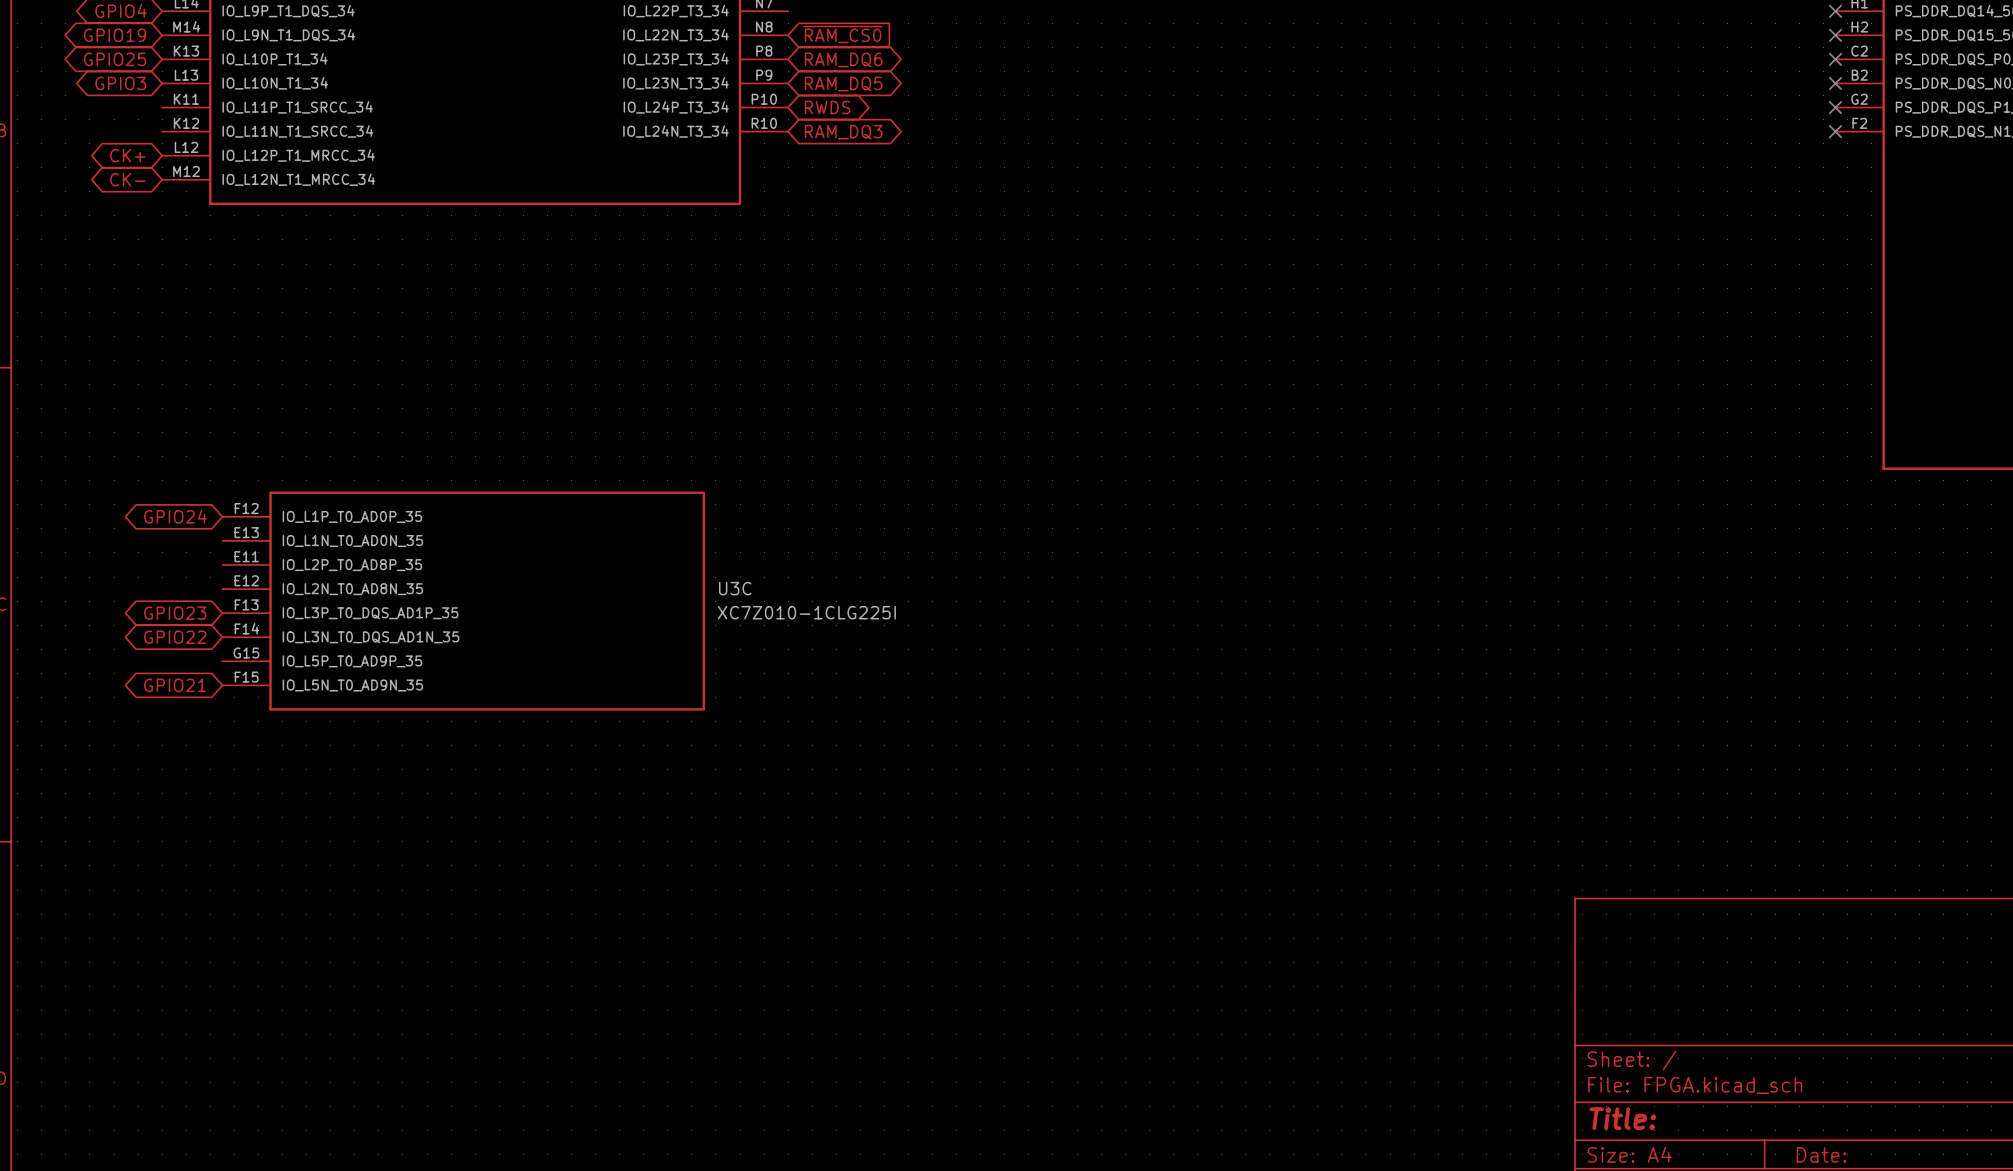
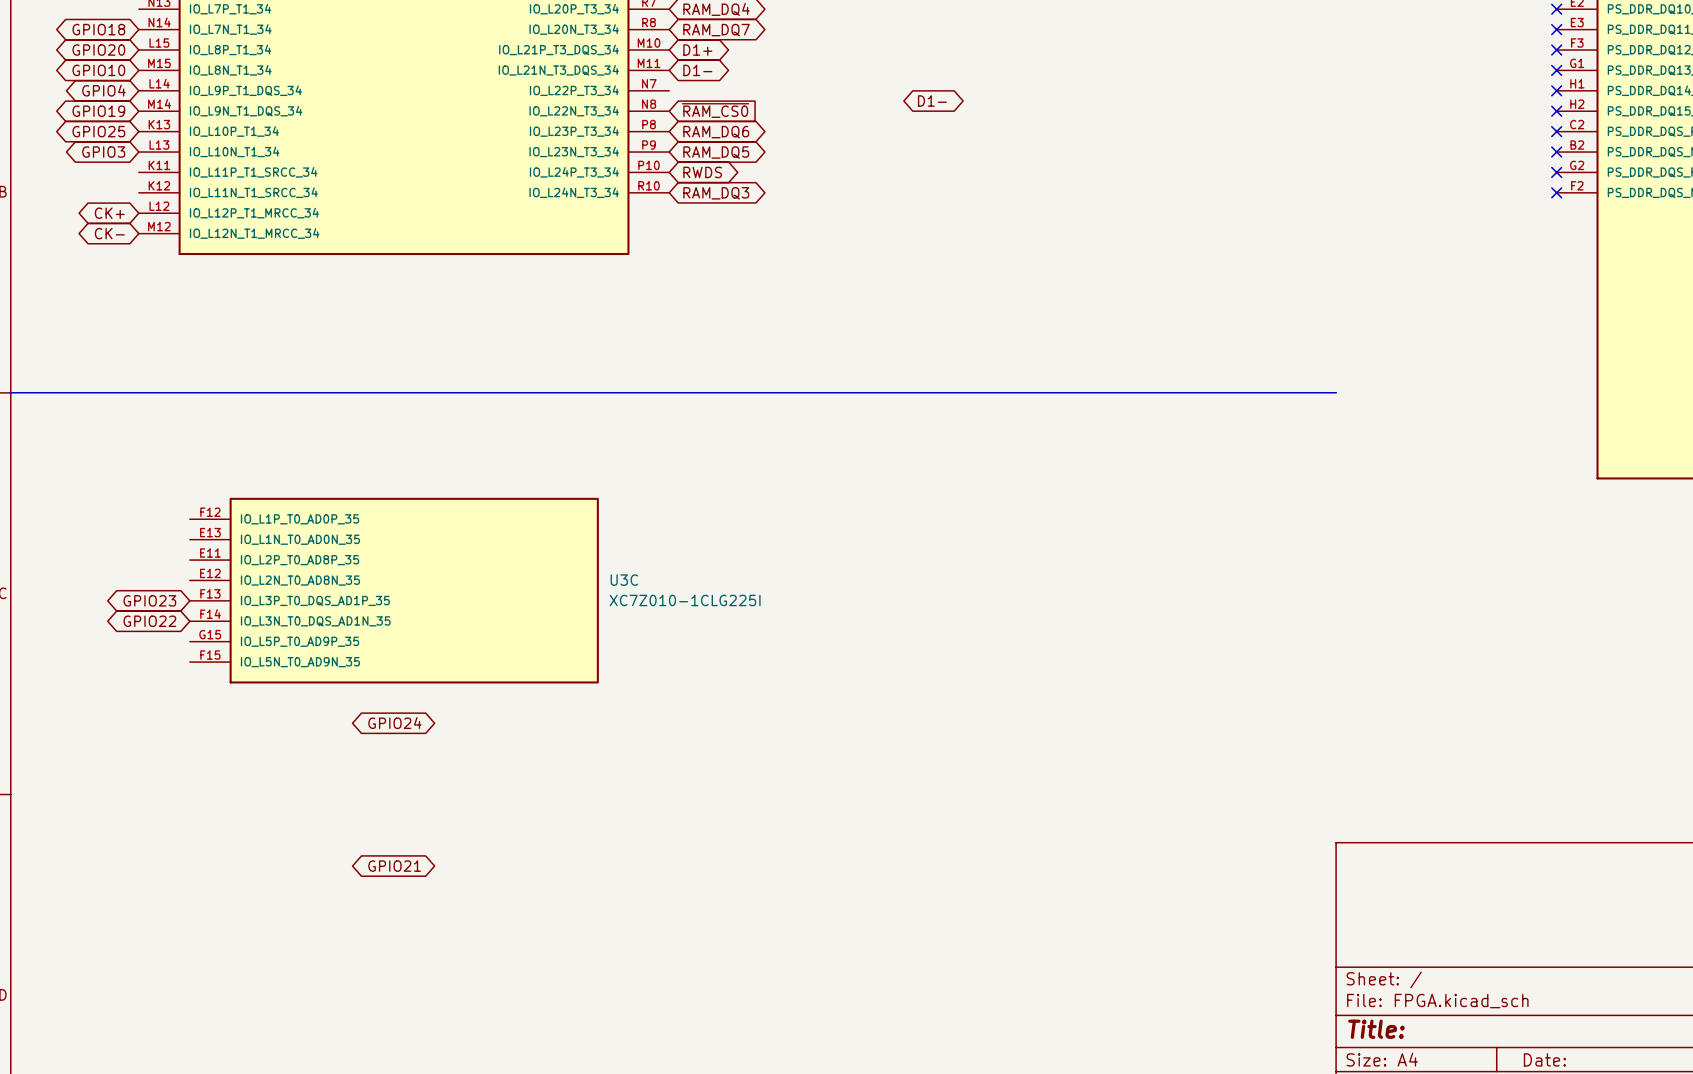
global label: none -> D1- (932, 101)
line: none -> (10, 392) (1336, 392)
global label: GPIO24 (175, 516) -> none
global label: GPIO21 (175, 685) -> none
global label: none -> GPIO24 (394, 723)
global label: none -> GPIO21 (394, 866)

